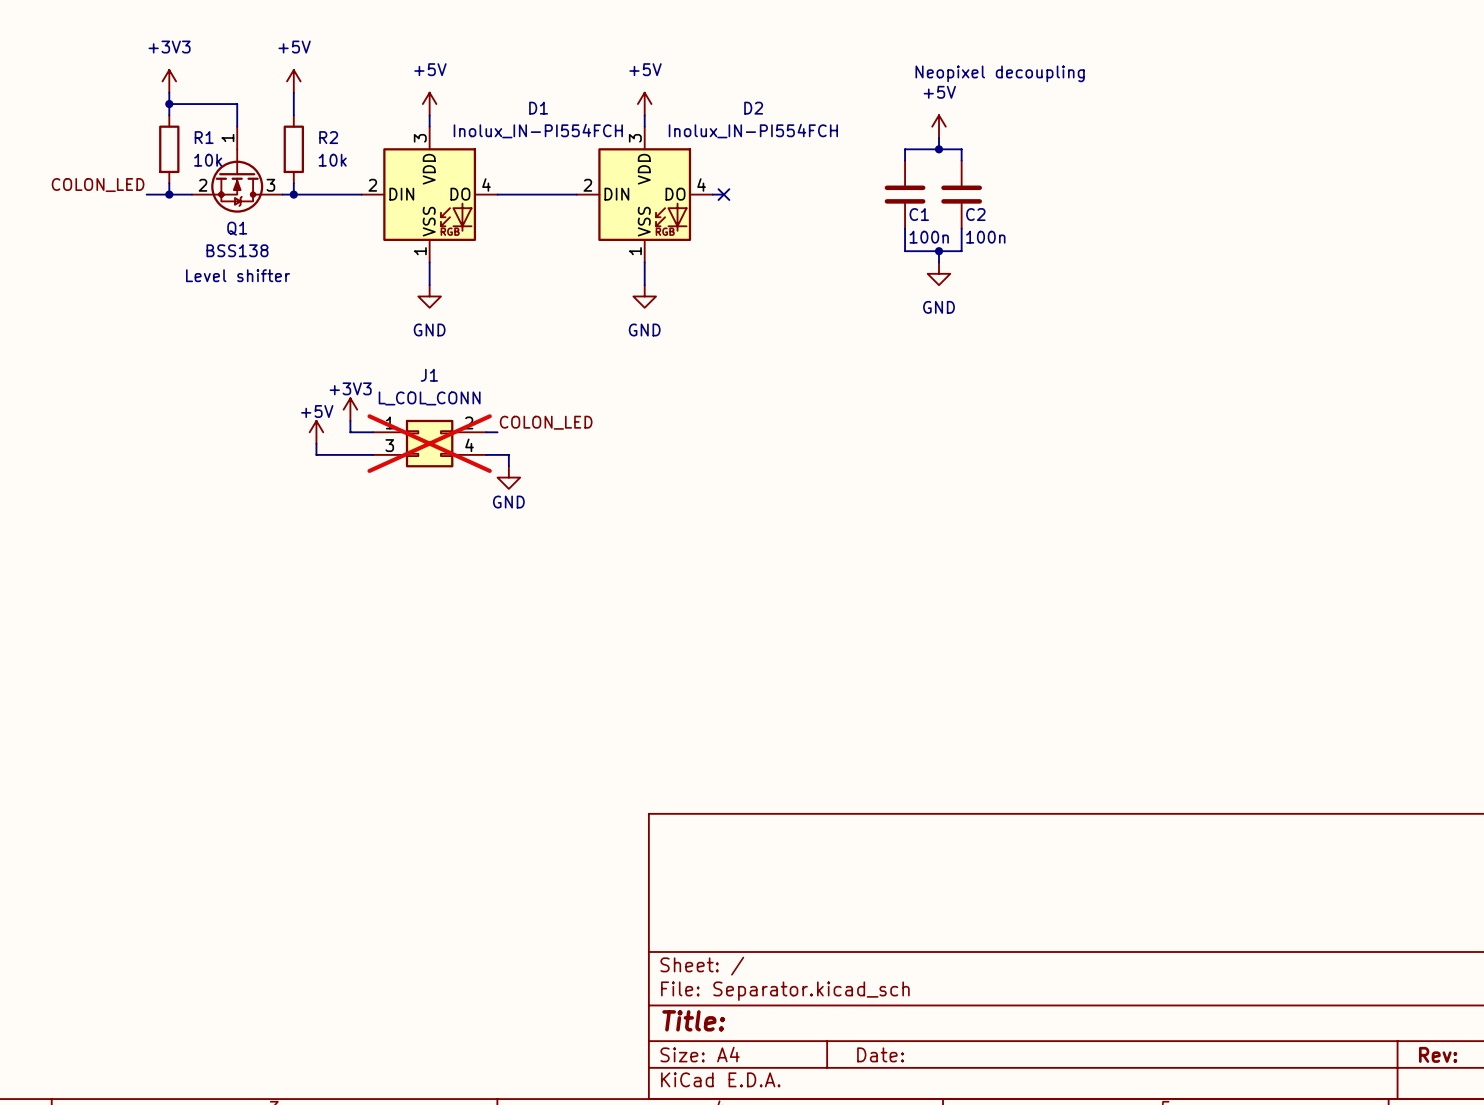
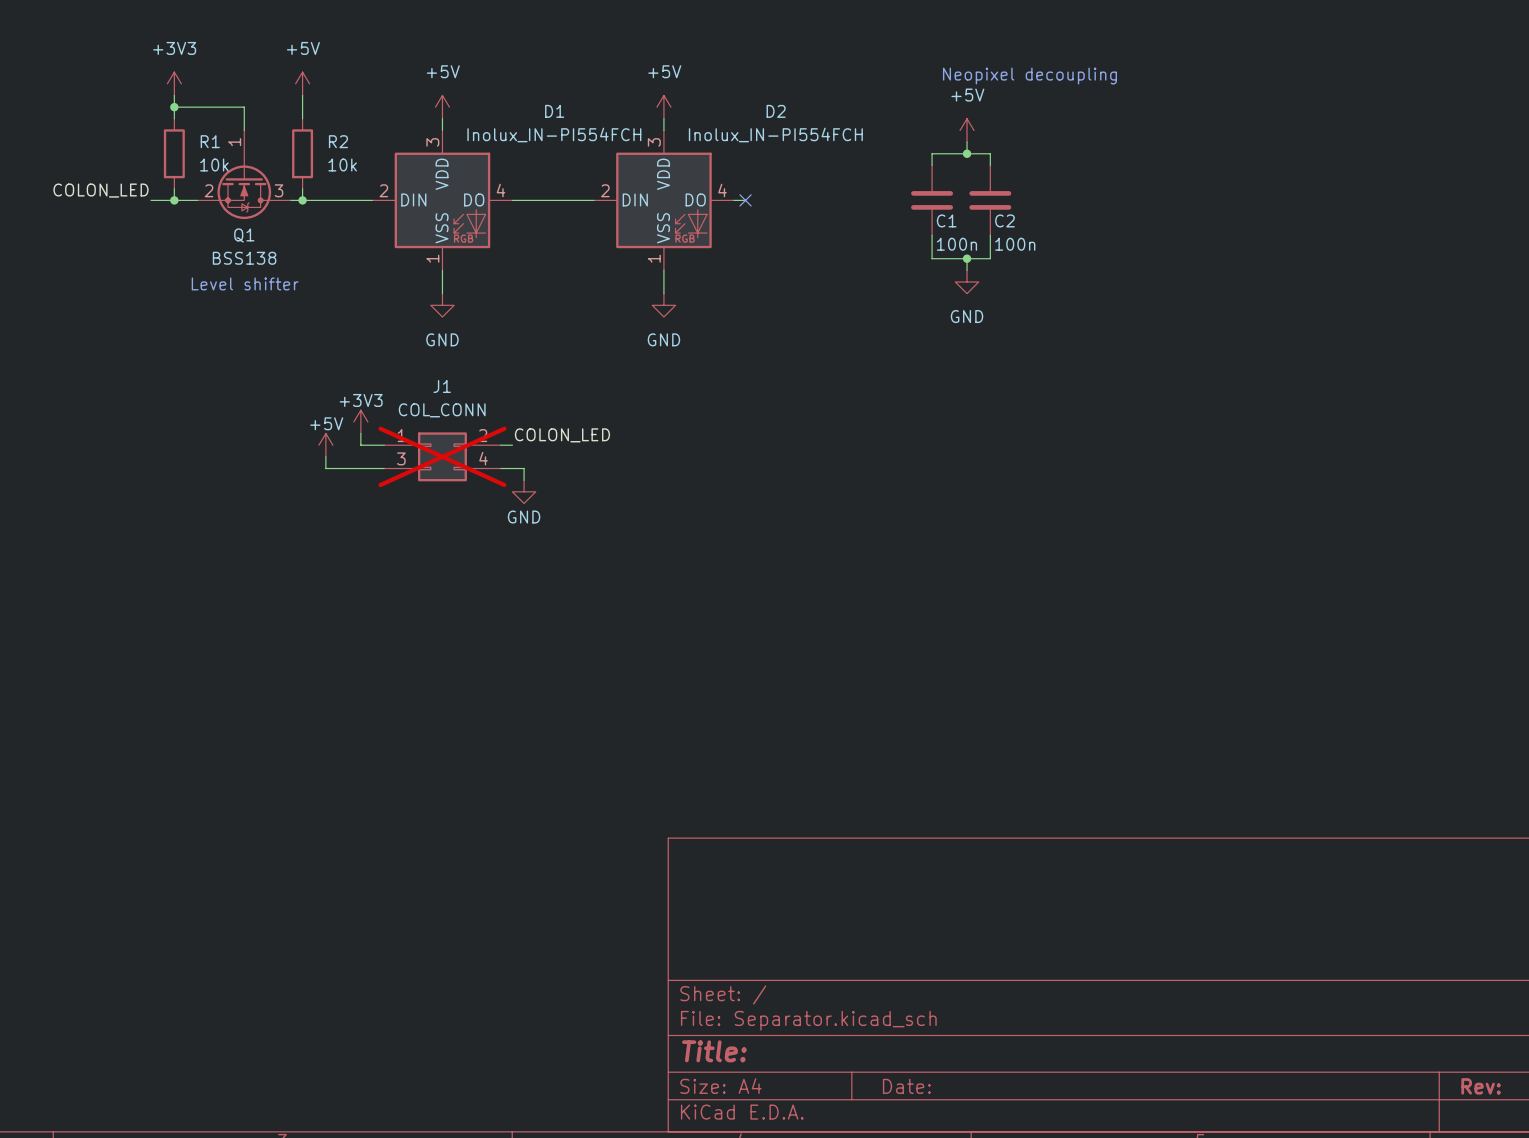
J1 value: L_COL_CONN (429, 398) -> COL_CONN (442, 410)

